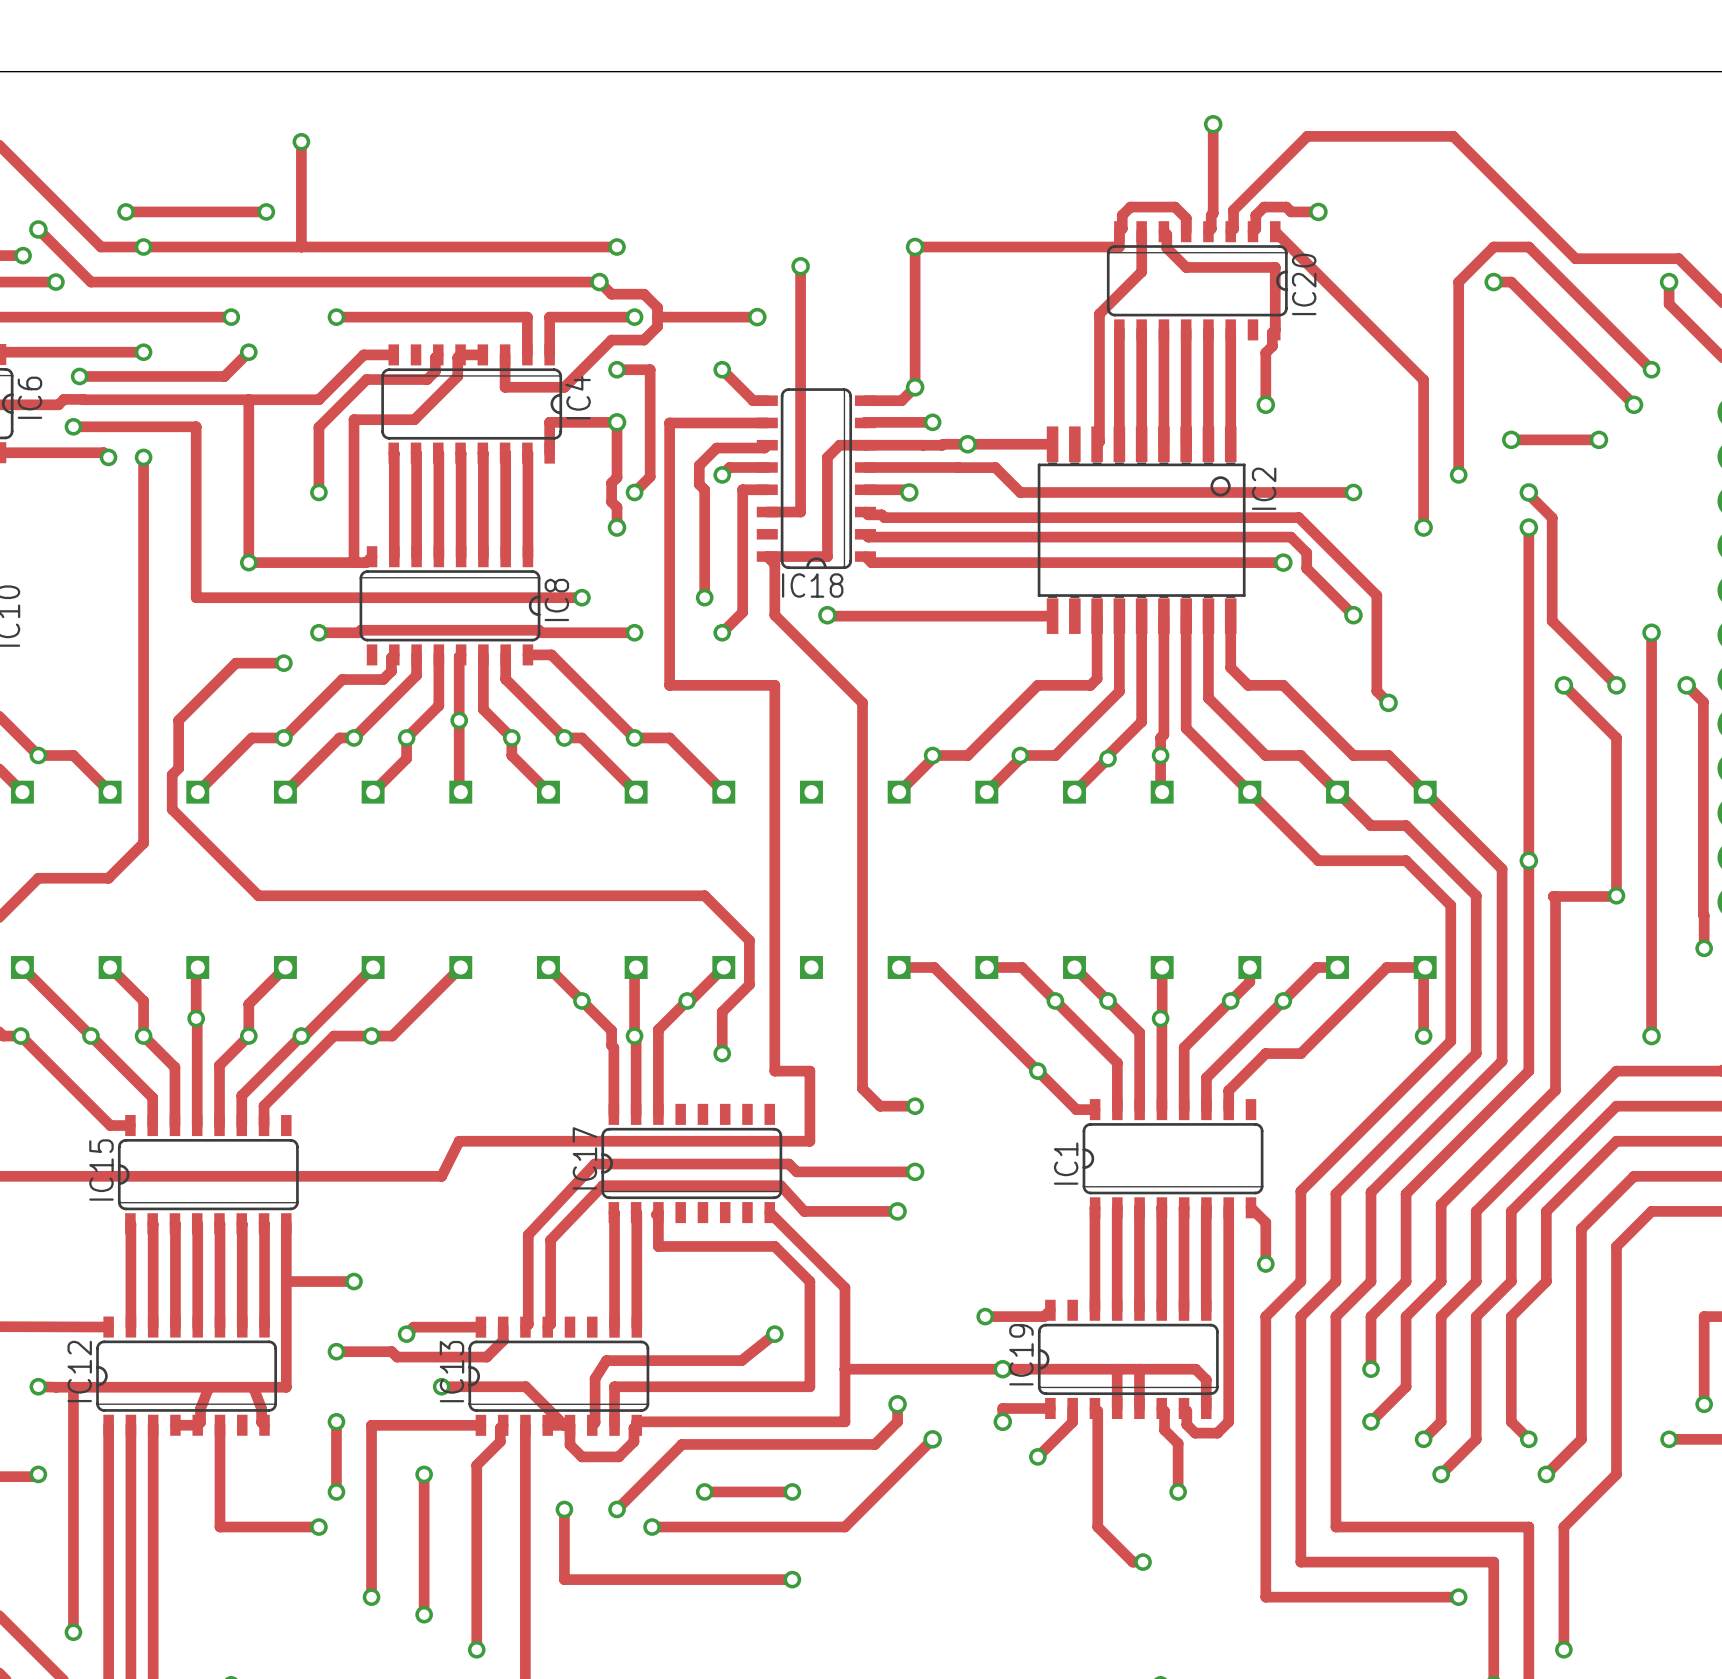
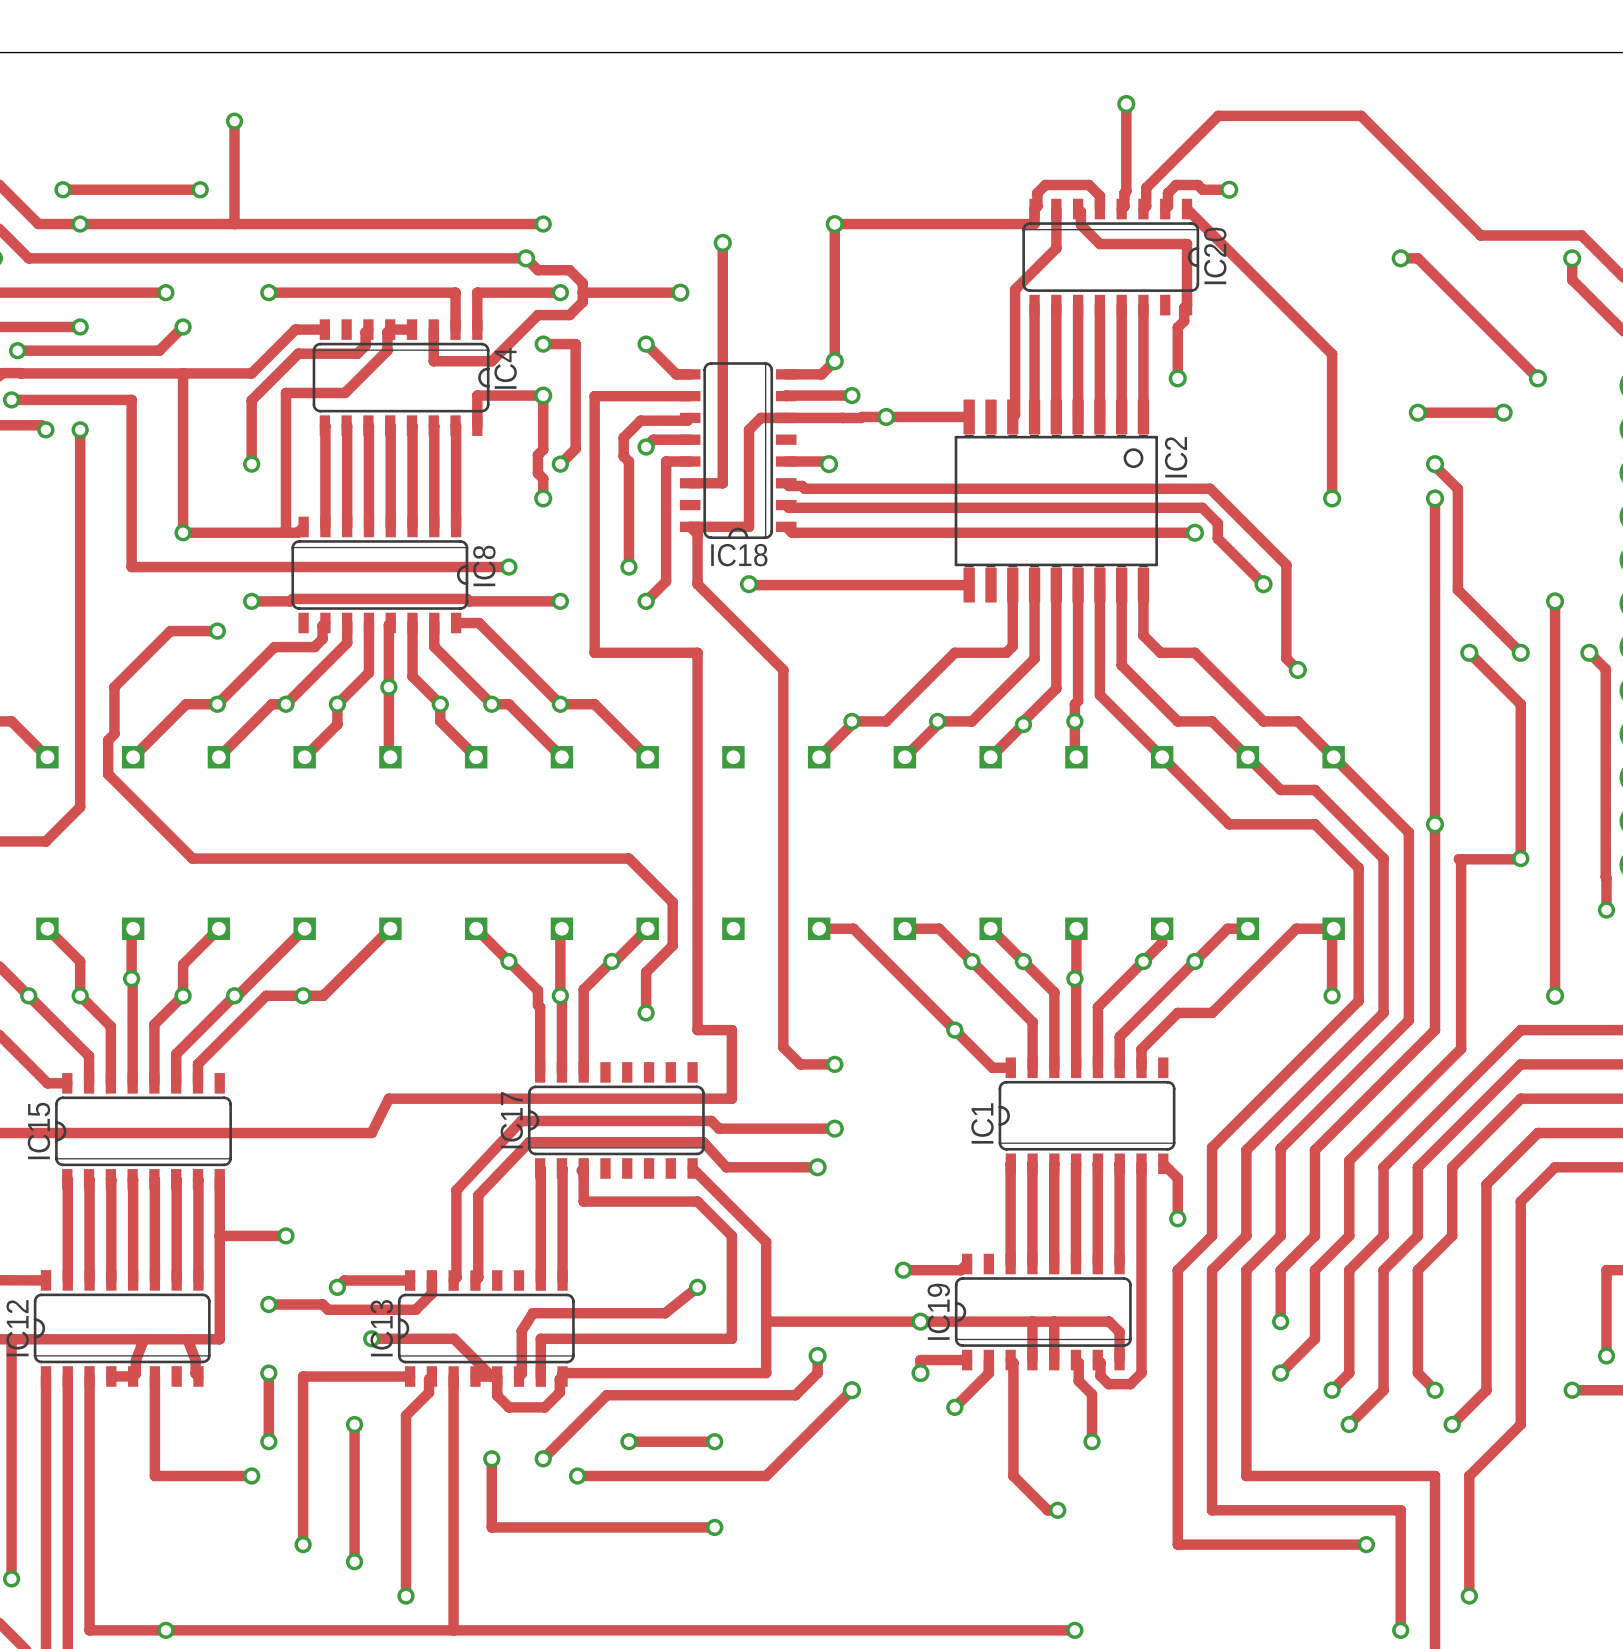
track: (1651, 369) (1528, 246) (1493, 246) (1458, 282) (1458, 474) -> none
via: (1651, 369) -> none
track: (865, 467) (995, 467) (1020, 492) (1353, 492) -> none
via: (1458, 474) -> none
via: (1353, 492) -> none

